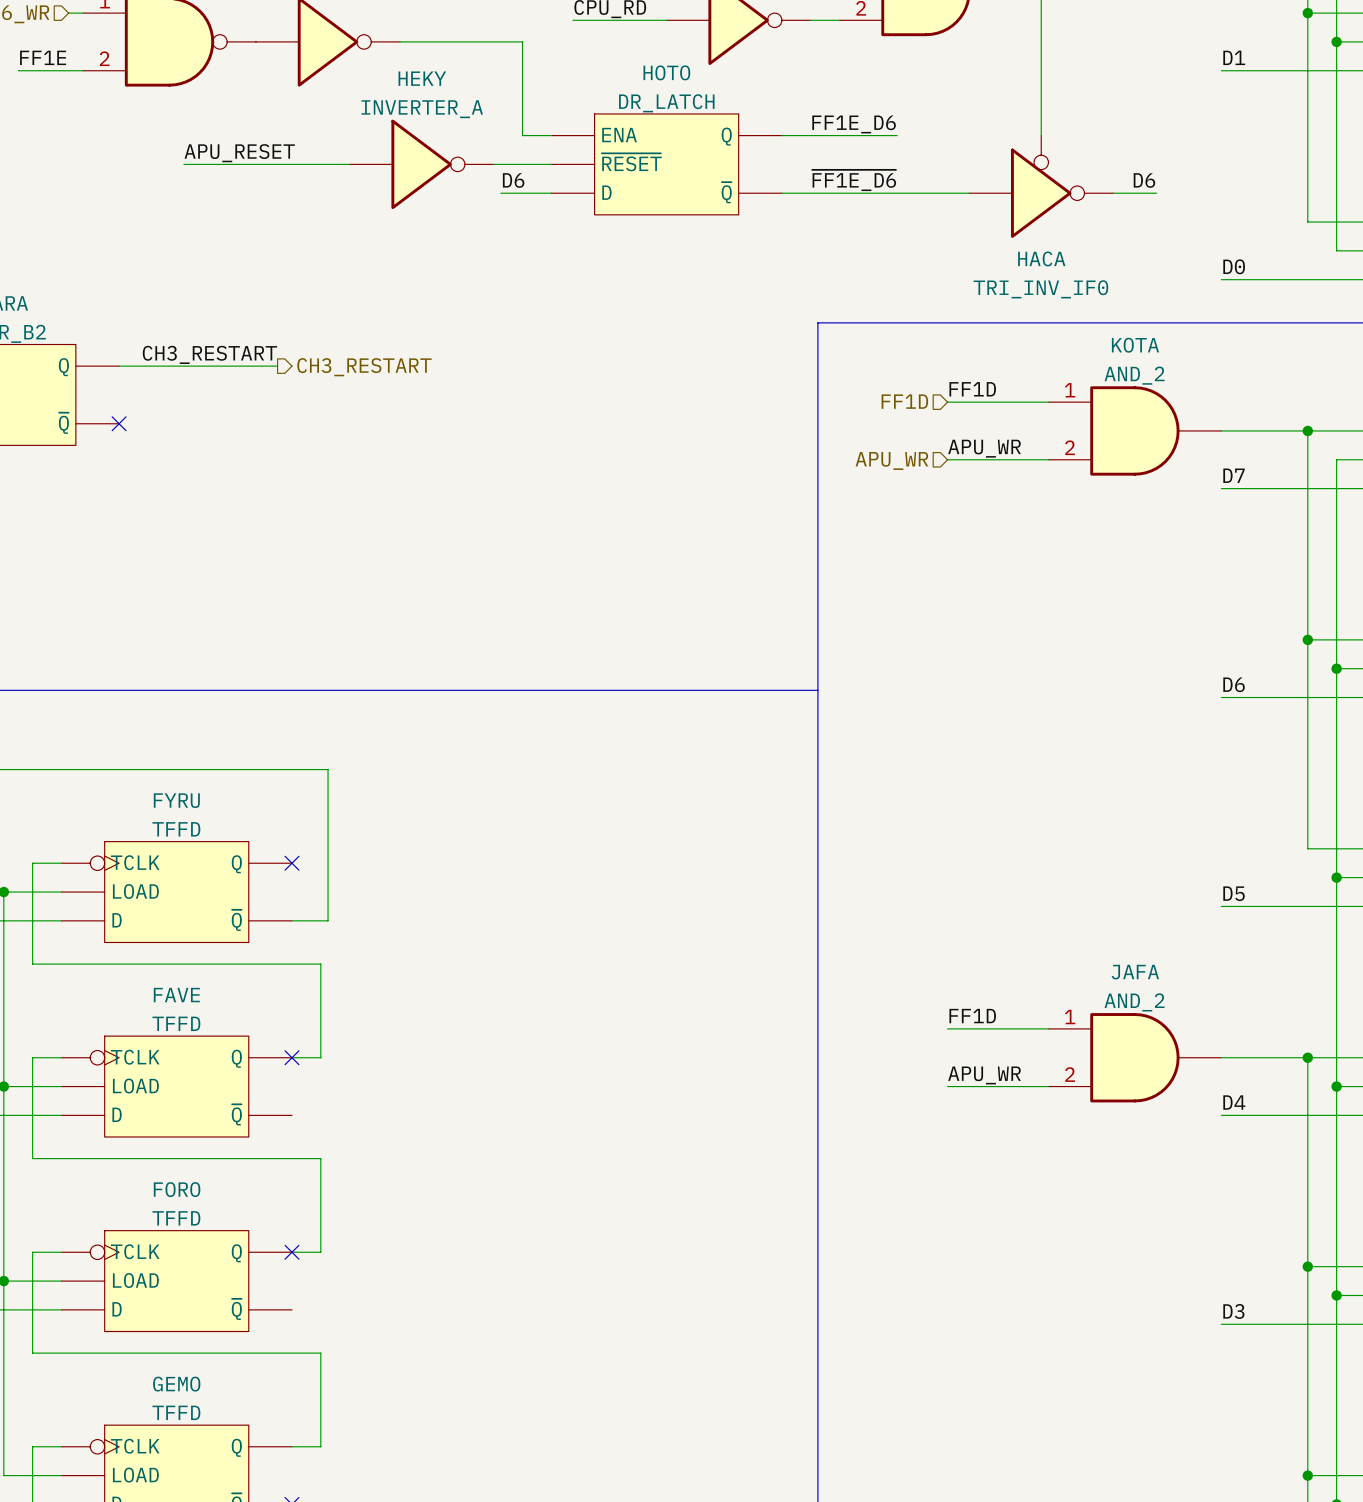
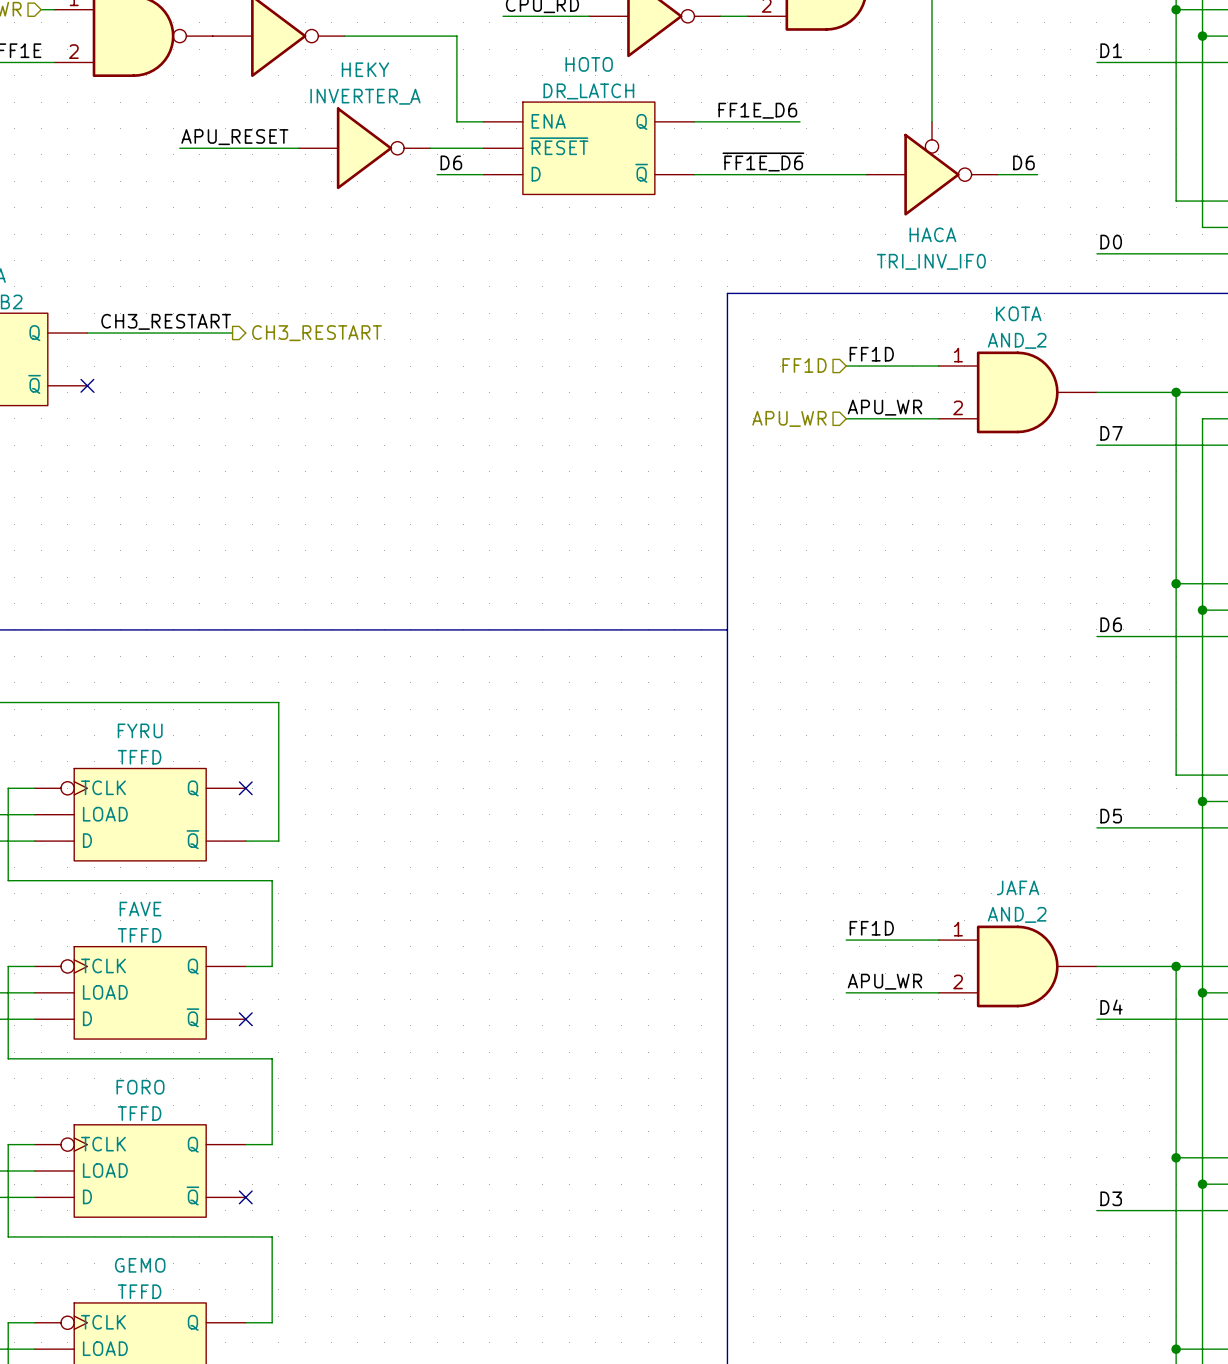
label position: APU_RESET (239, 153) -> APU_RESET (234, 137)
wire: (183, 164) (219, 164) -> none
no-connect mark position: (291, 1057) -> (245, 1019)
no-connect mark position: (291, 1252) -> (245, 1197)

